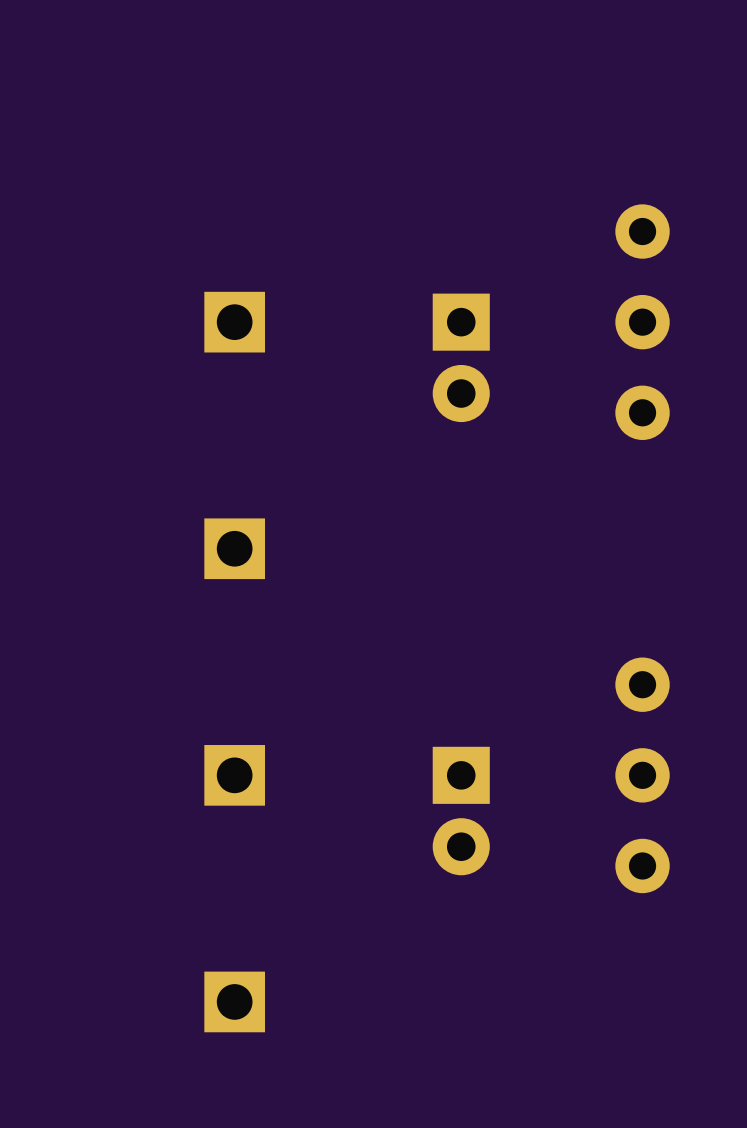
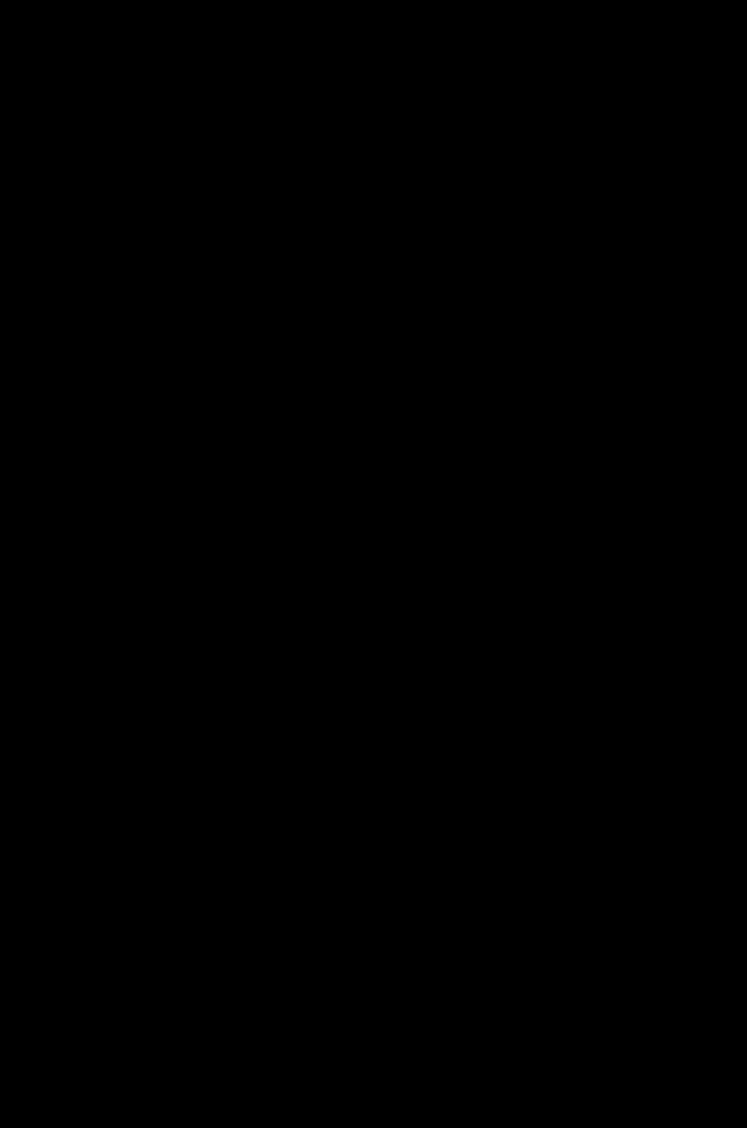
part: (234, 322) -> none
part: (642, 322) -> none
part: (461, 357) -> none
part: (234, 548) -> none
part: (234, 775) -> none
part: (642, 775) -> none
part: (461, 811) -> none
part: (234, 1001) -> none

